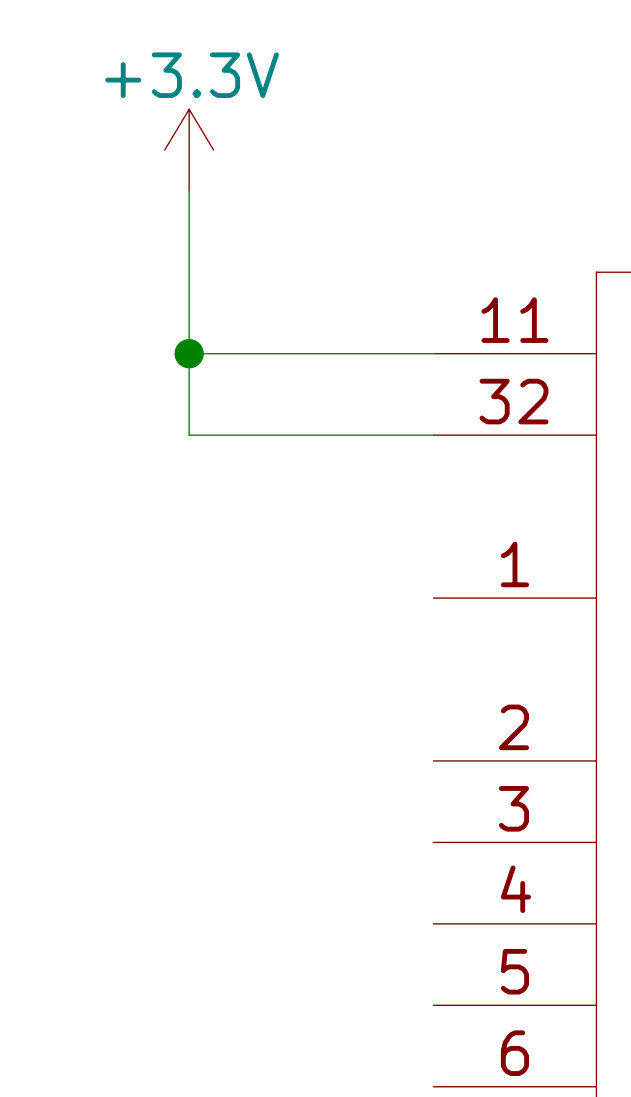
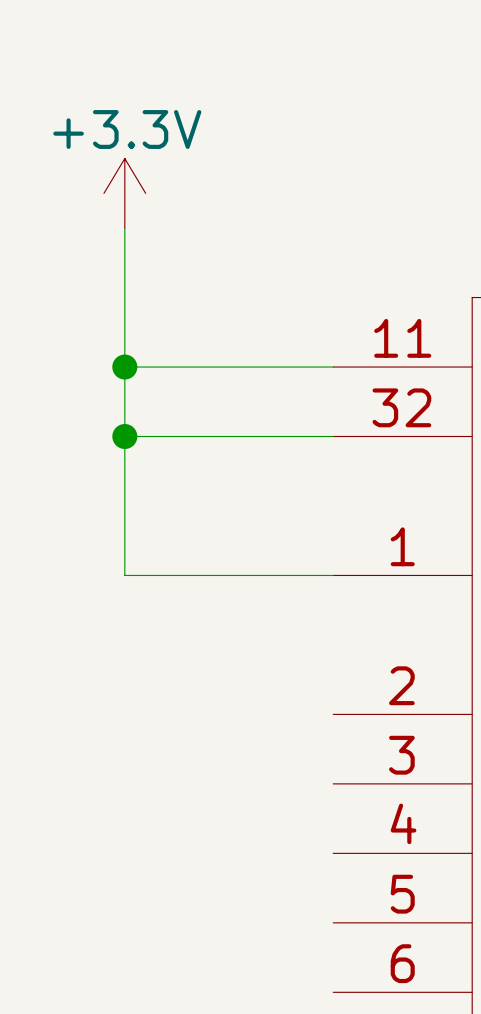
wire: none -> (124, 436) (124, 575) (333, 575)
junction: none -> (124, 436)

